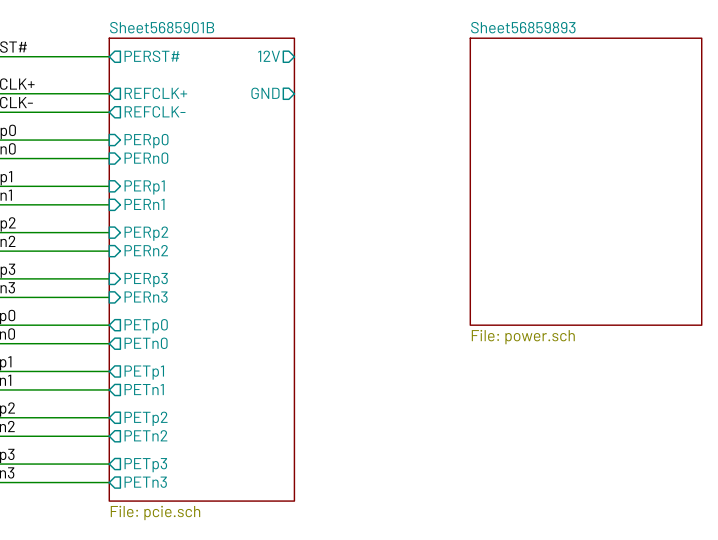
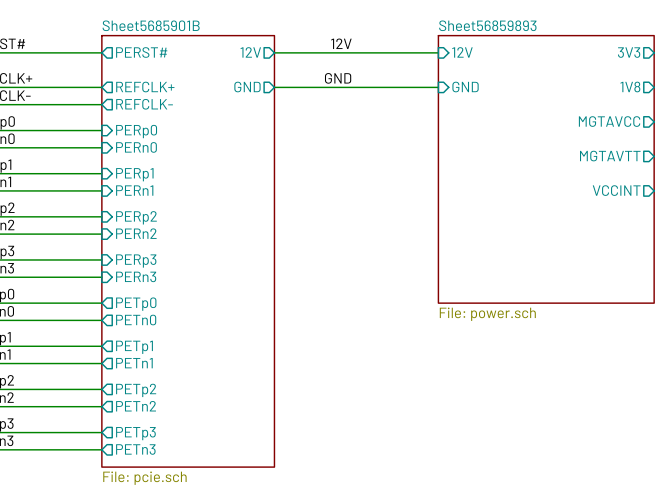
label: none -> 12V (341, 43)
wire: none -> (274, 52) (438, 52)
sheet pin: none -> 12V (462, 52)
sheet pin: none -> 3V3 (629, 52)
label: none -> GND (338, 78)
wire: none -> (274, 87) (438, 87)
sheet pin: none -> GND (465, 87)
sheet pin: none -> 1V8 (630, 87)
sheet pin: none -> MGTAVCC (609, 121)
sheet pin: none -> MGTAVTT (610, 156)
sheet pin: none -> VCCINT (616, 190)

